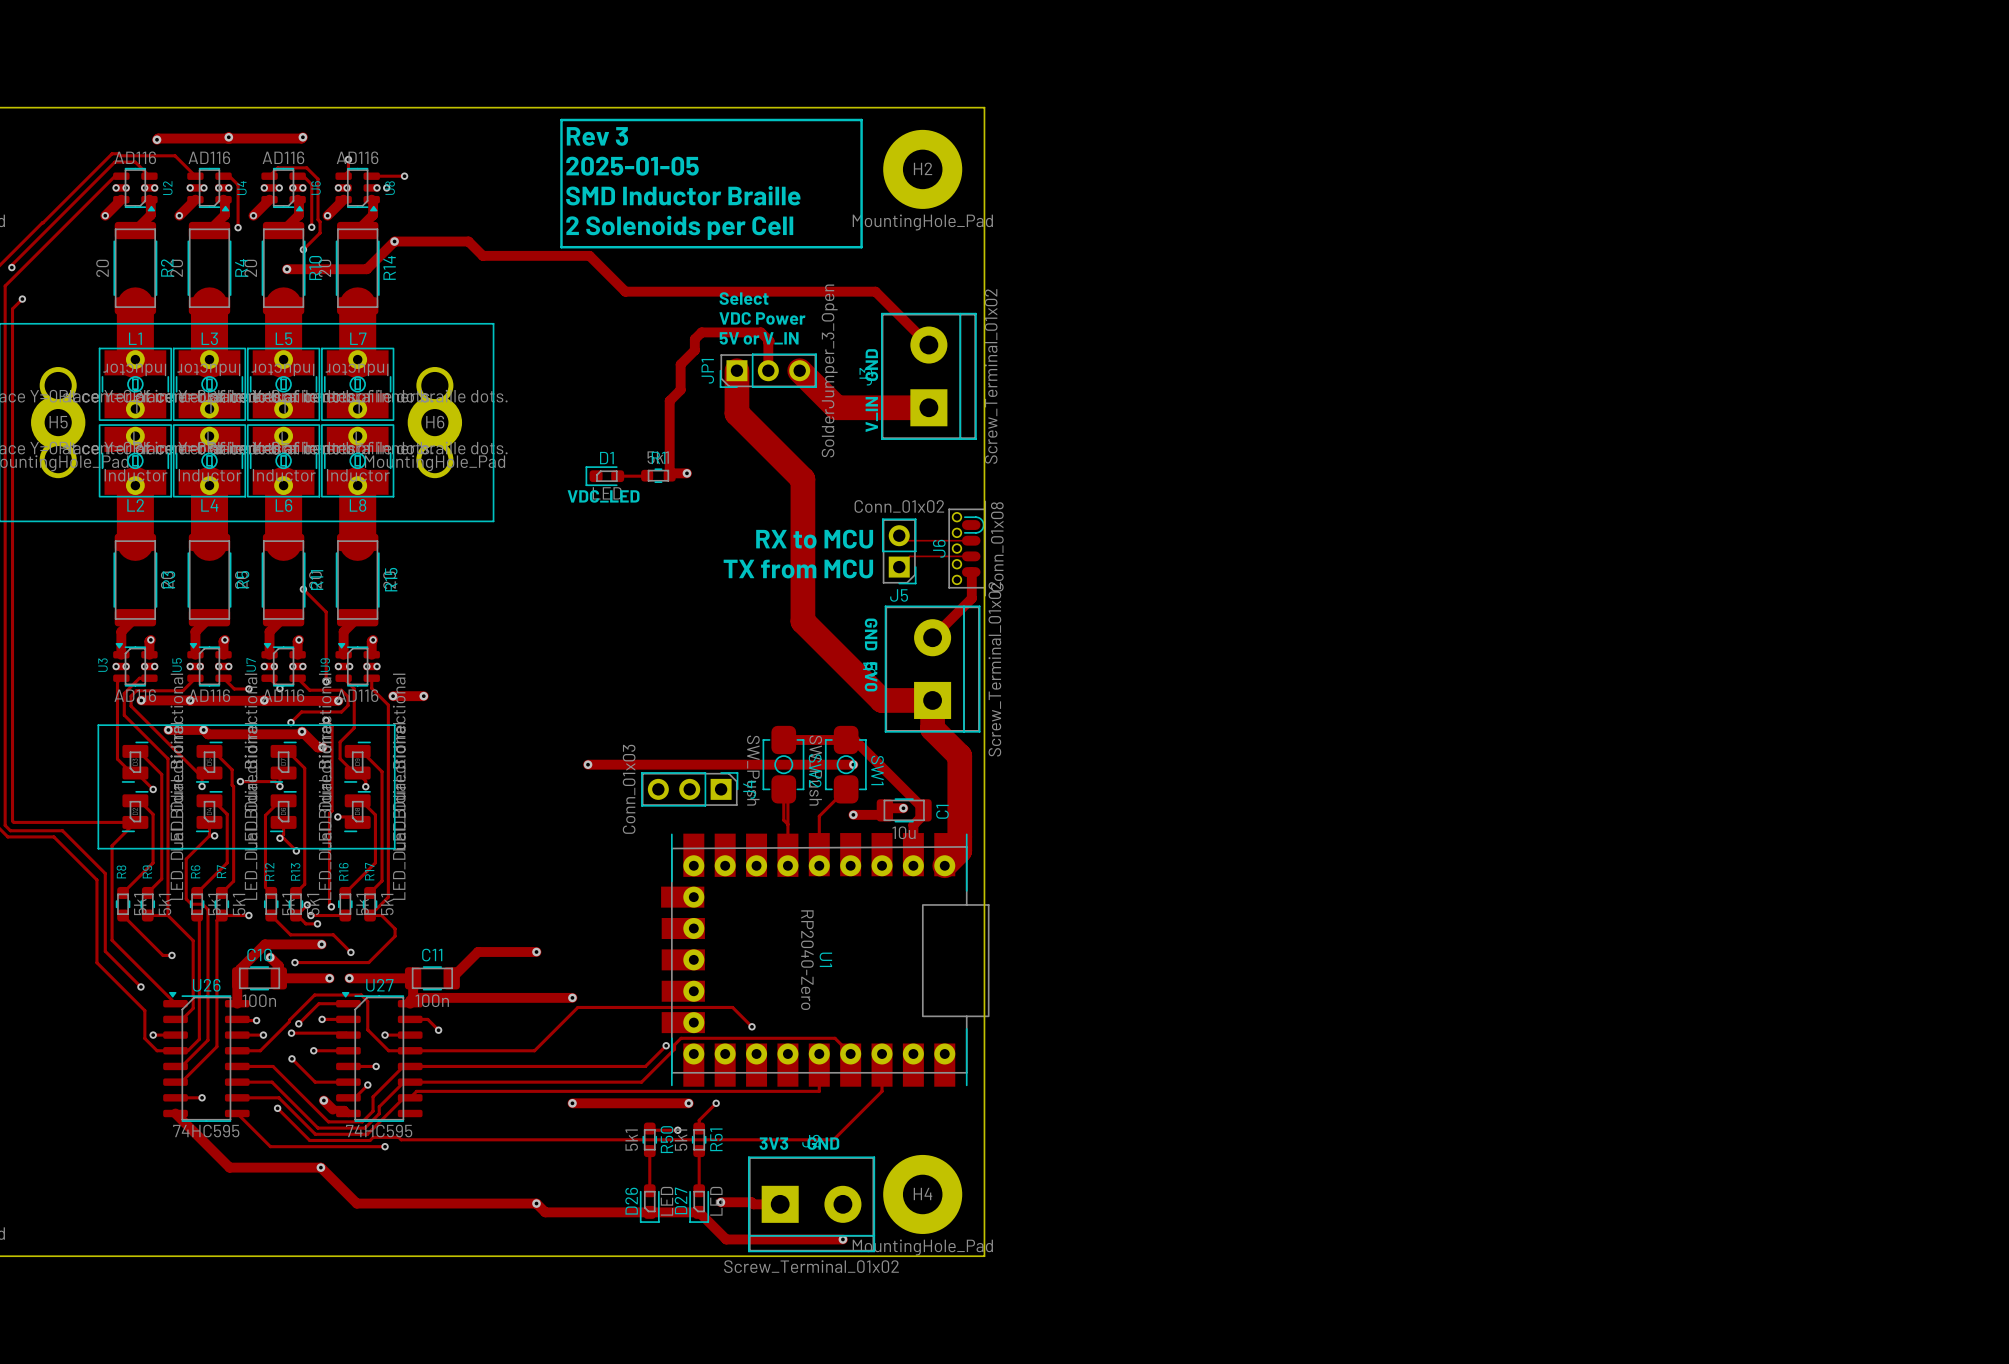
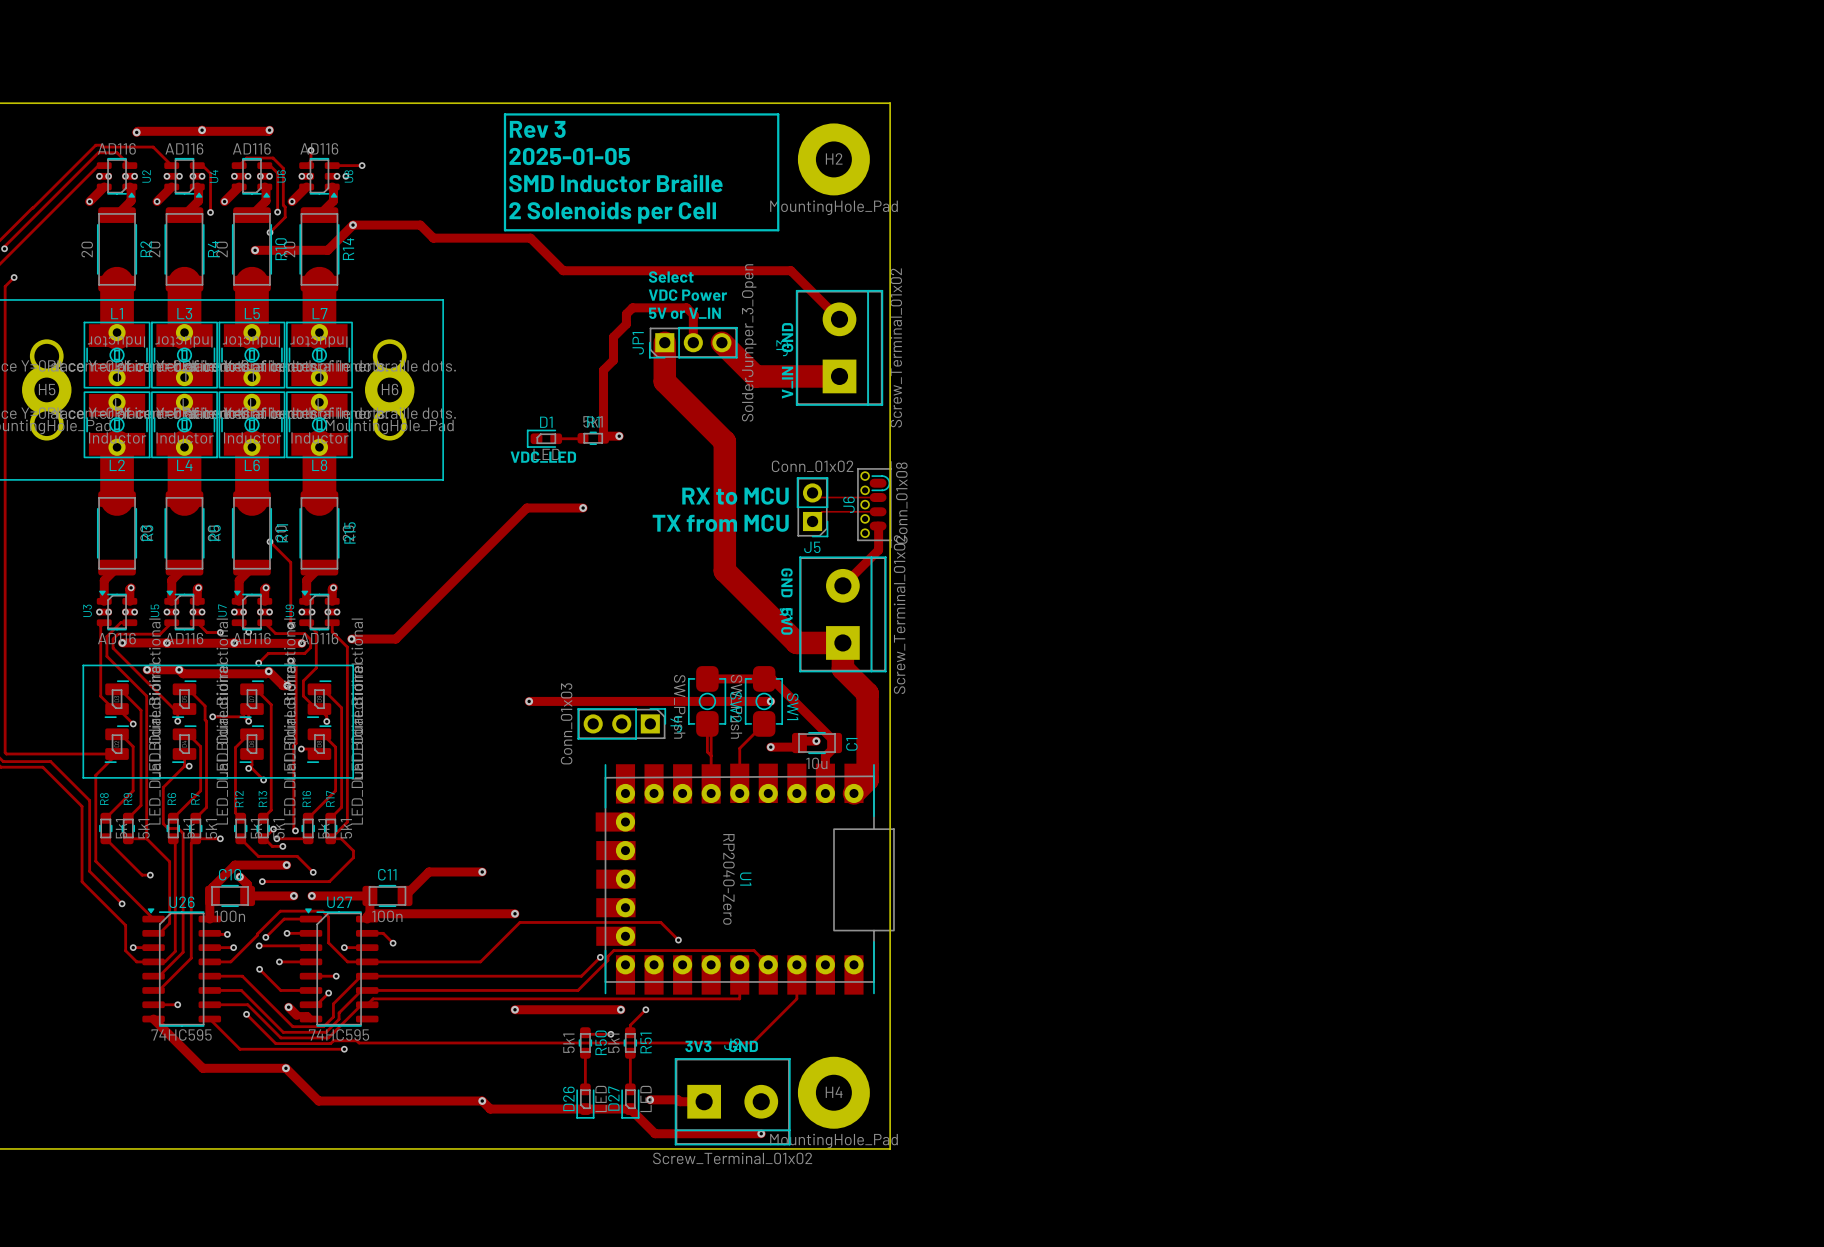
track: none -> (583, 508) (526, 508) (395, 639) (379, 639)
via: none -> (583, 508)
via: (423, 696) -> none

